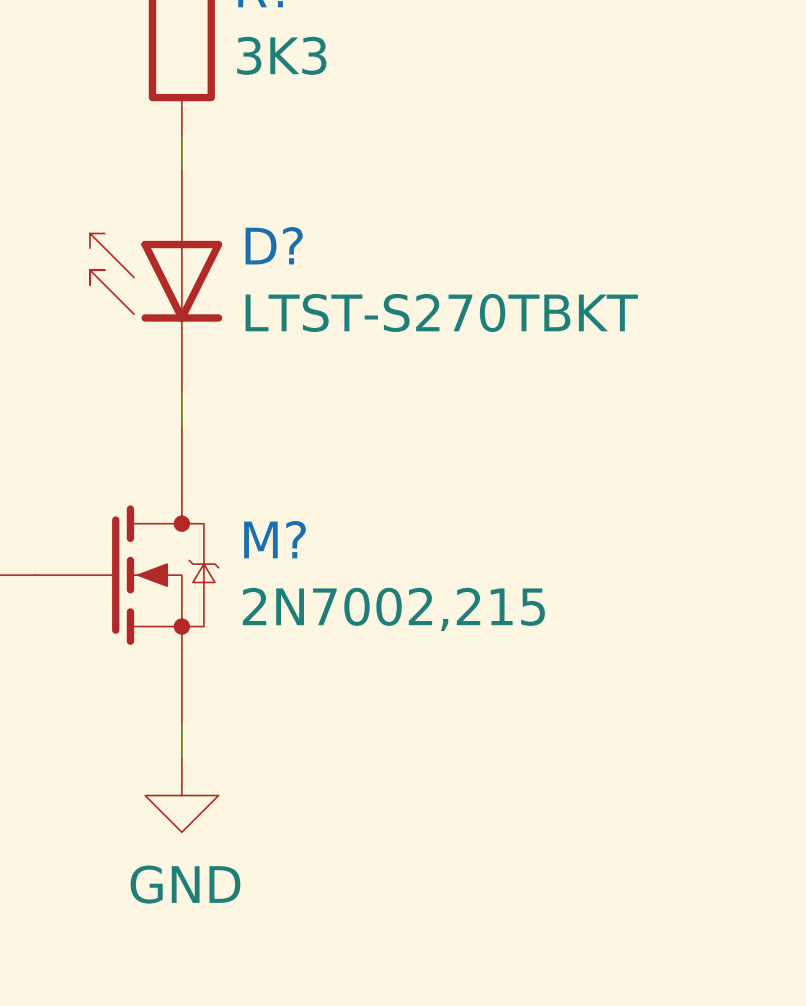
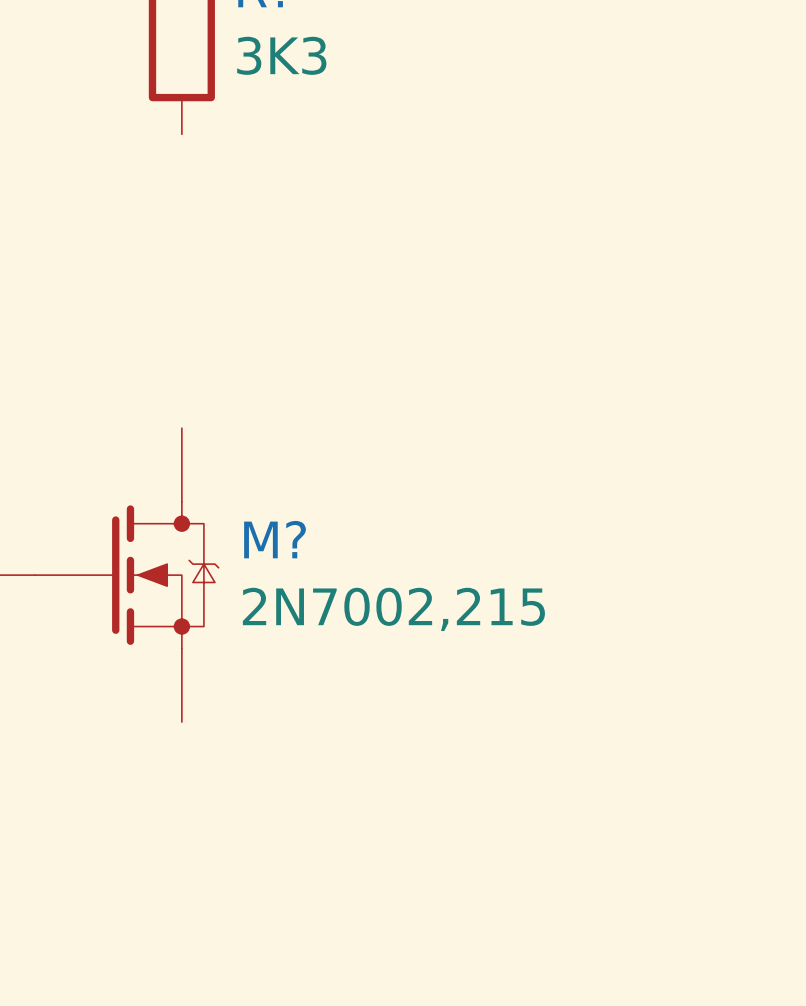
wire: (181, 134) (181, 171) -> none
D?: LTST-S270TBKT (156, 281) -> none
wire: (181, 391) (181, 428) -> none
wire: (181, 722) (181, 758) -> none
power symbol: GND (181, 795) -> none

